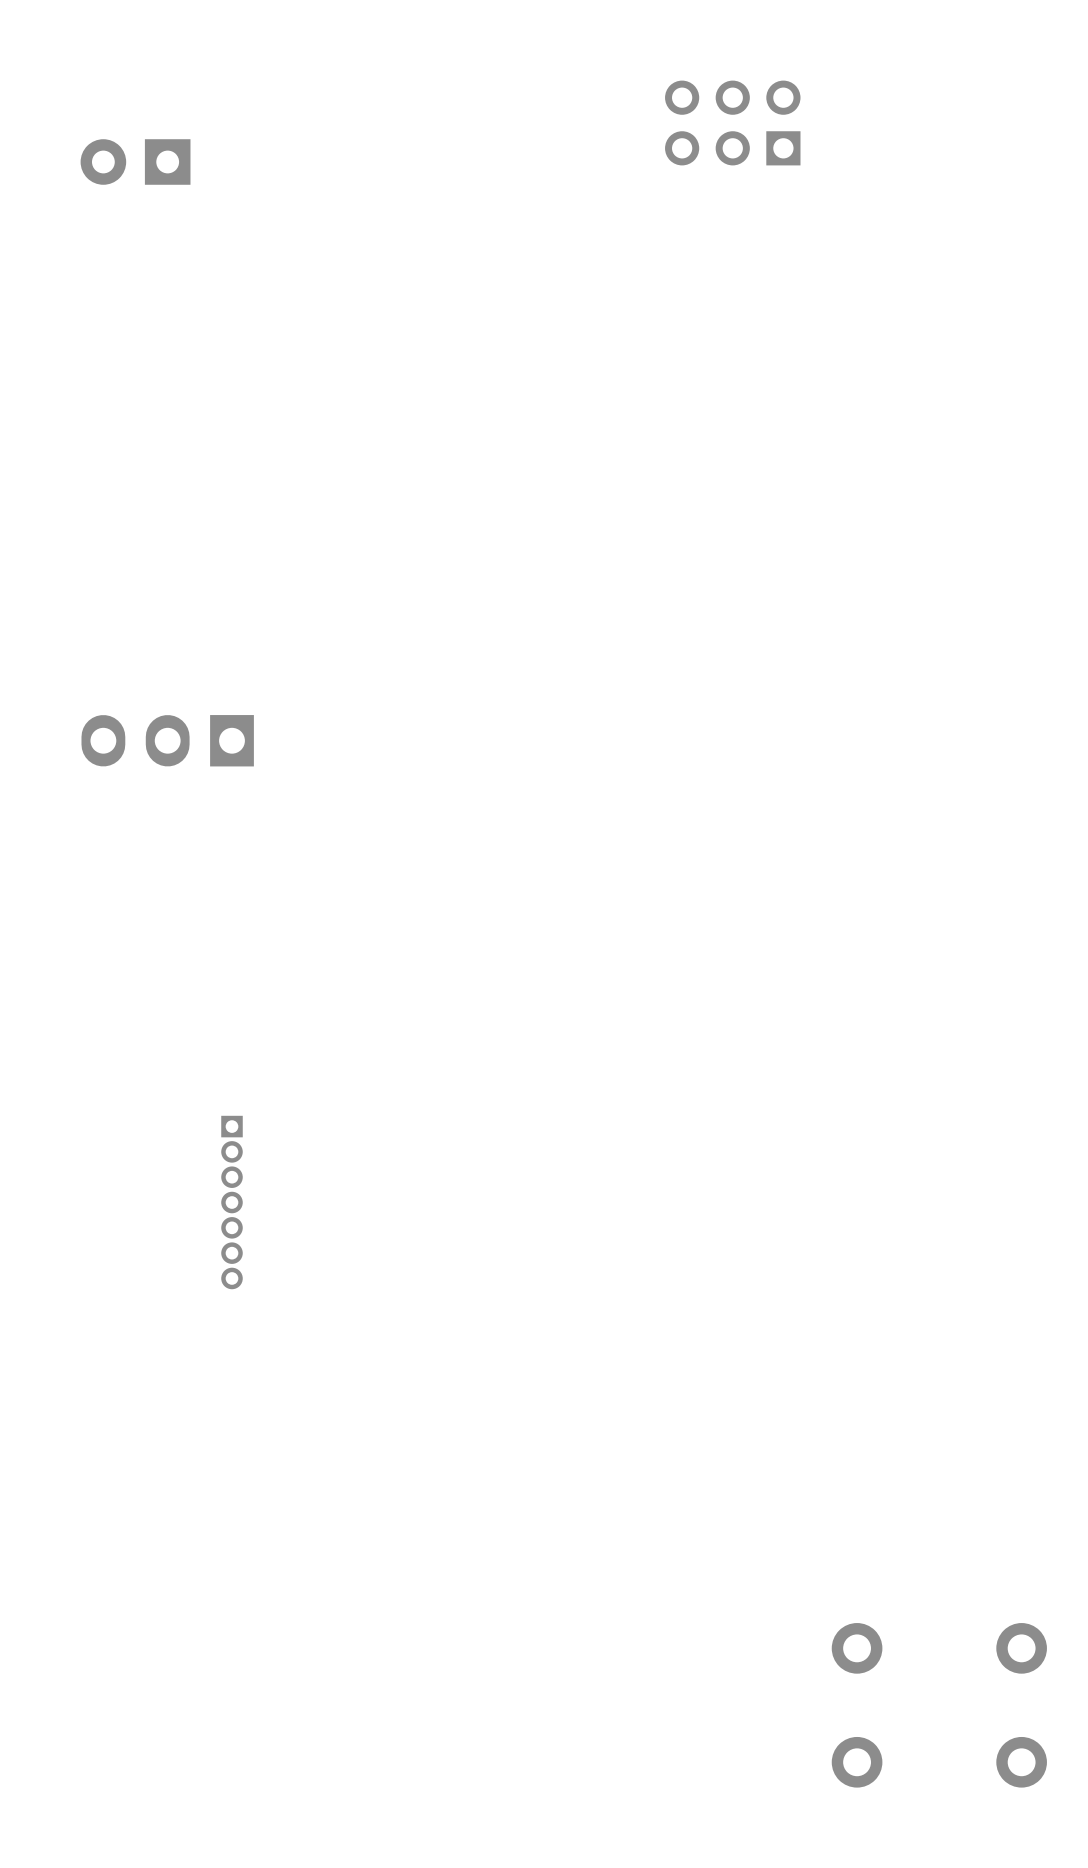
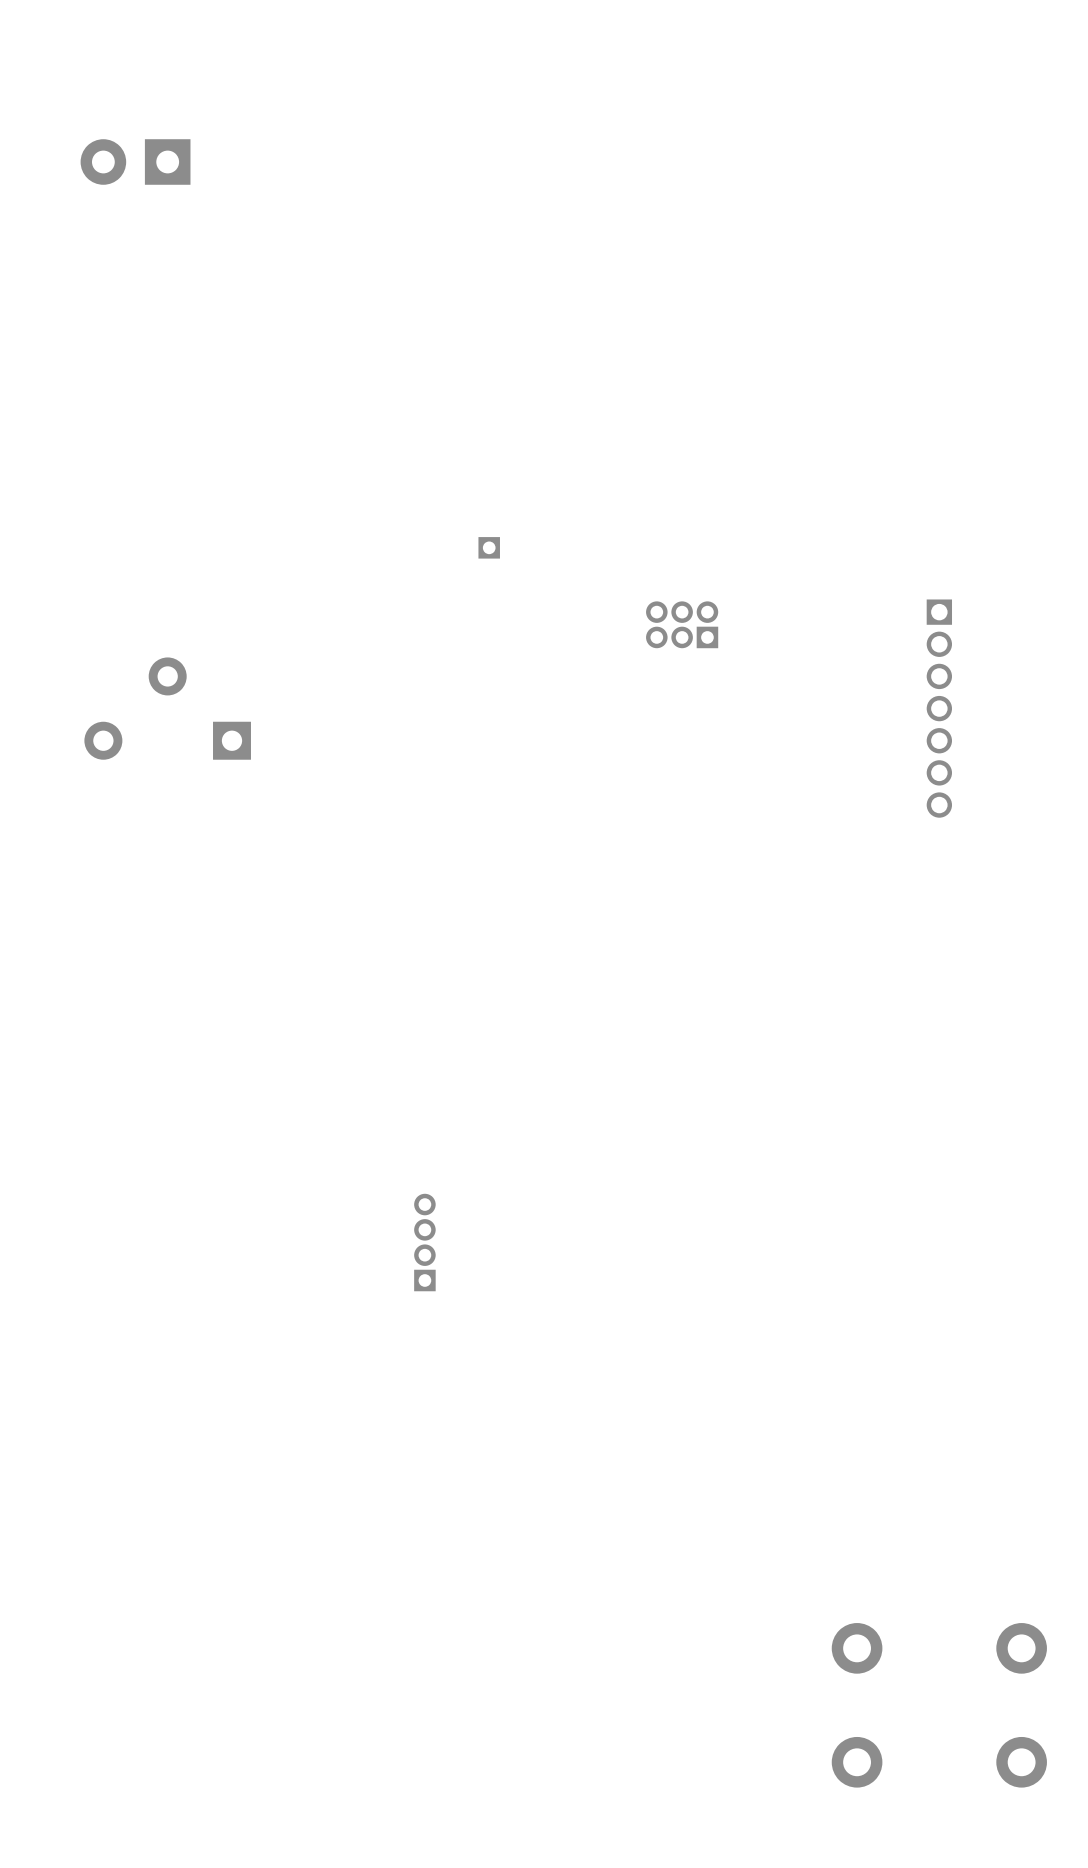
part: (732, 123) -> none
part: none -> (489, 547)
part: none -> (682, 624)
part: none -> (167, 708)
part: none -> (939, 708)
part: (167, 740) -> none
part: (231, 1202) -> none
part: none -> (424, 1242)

